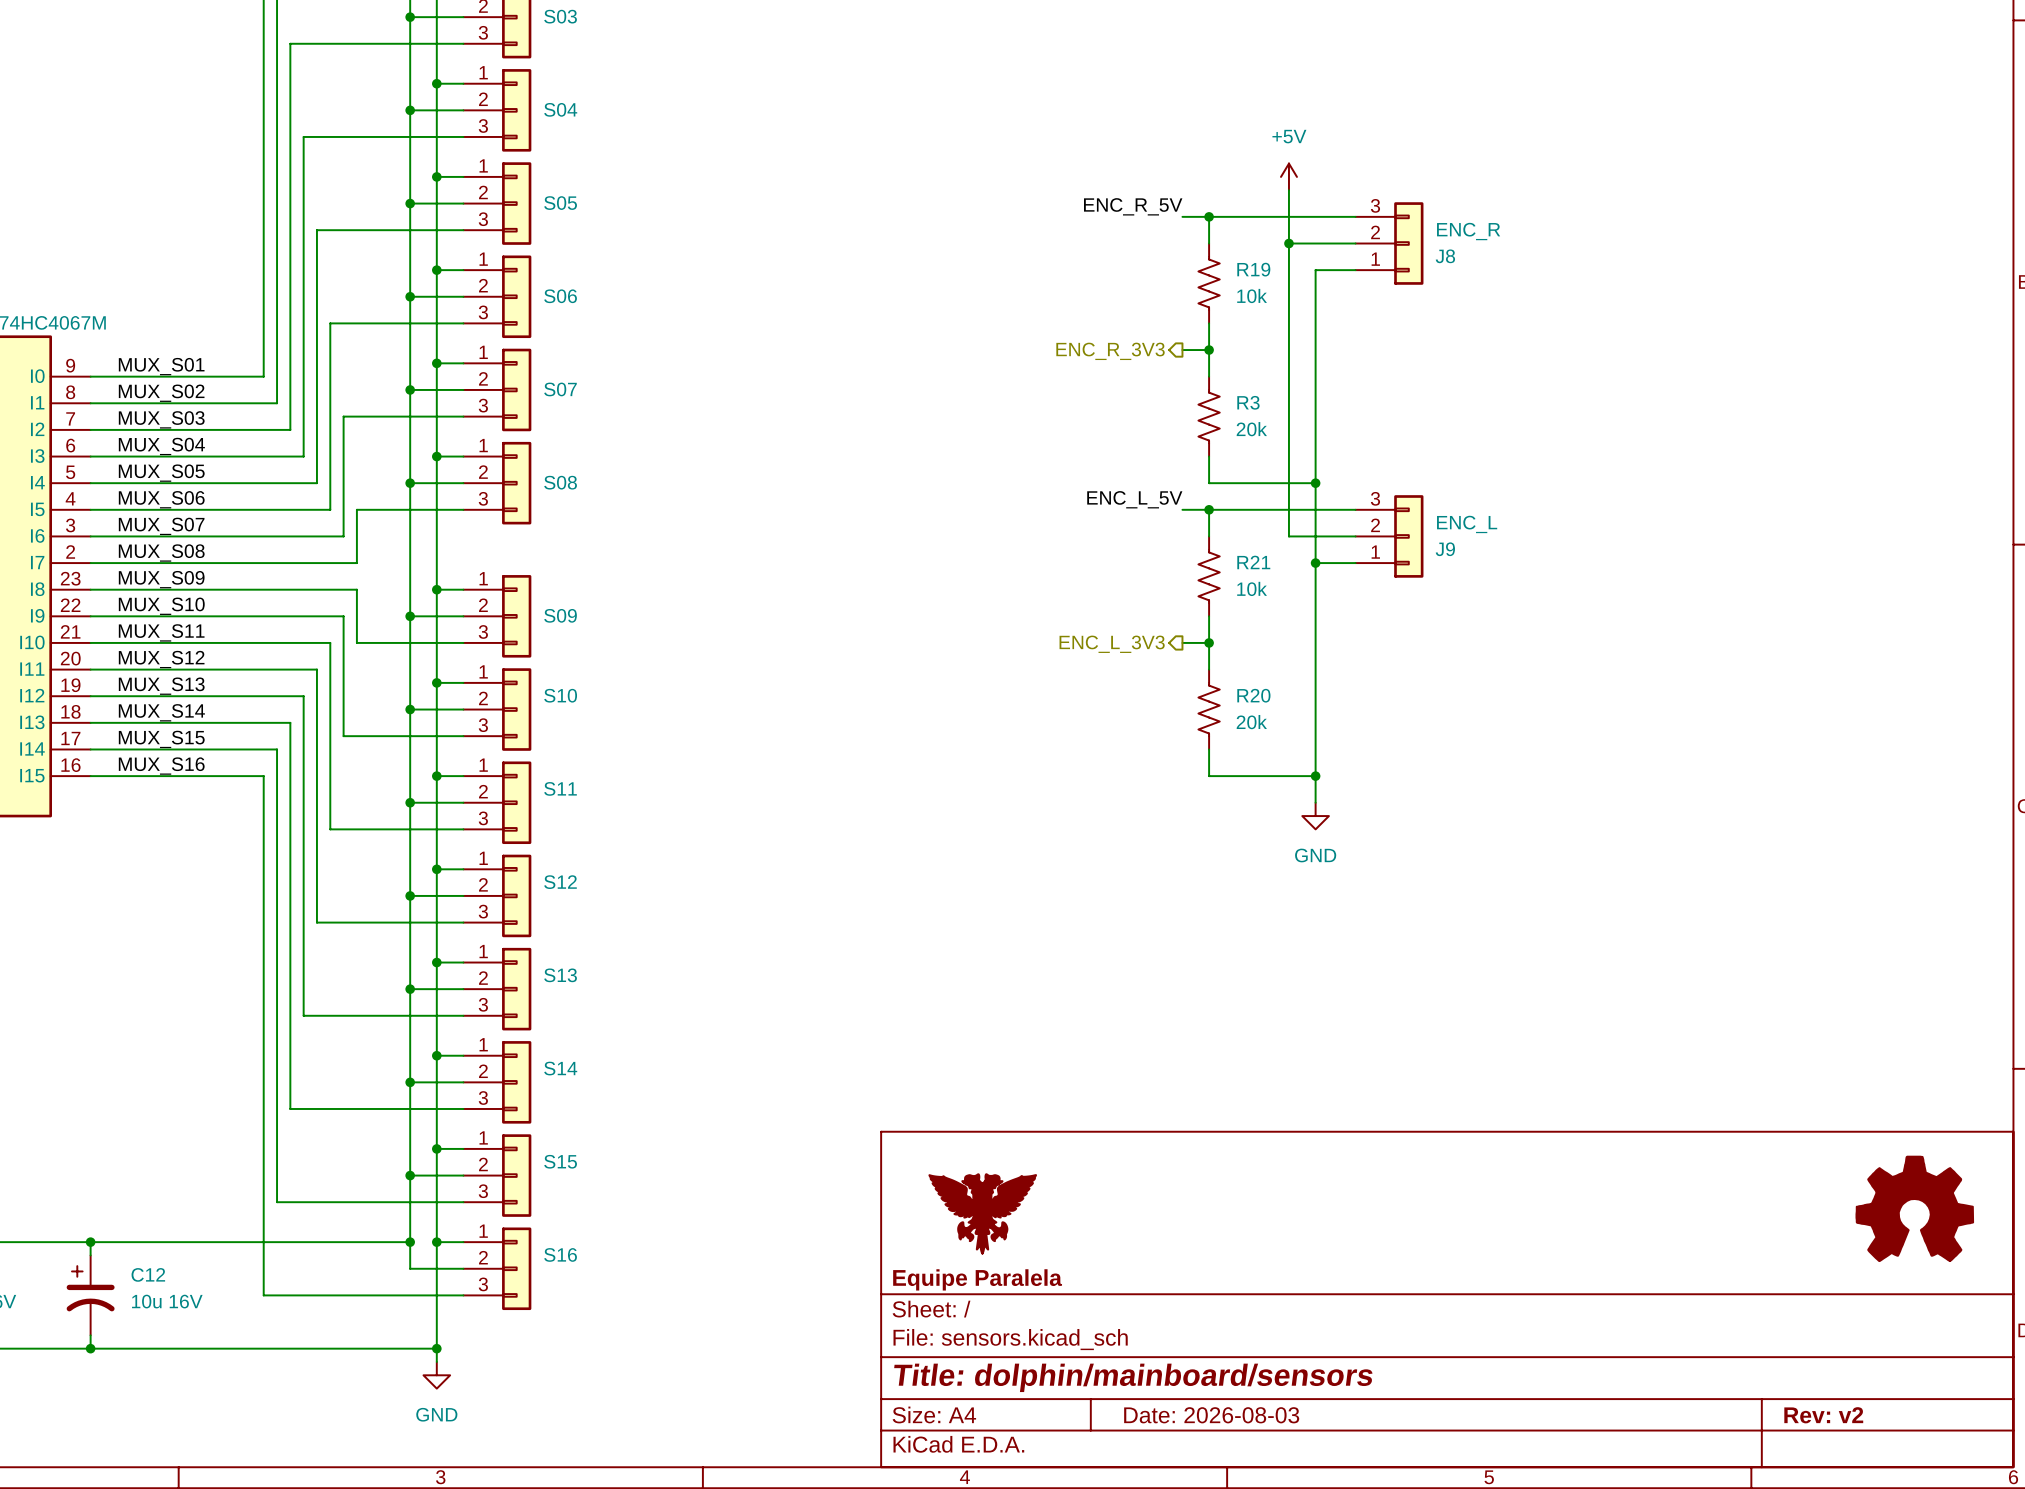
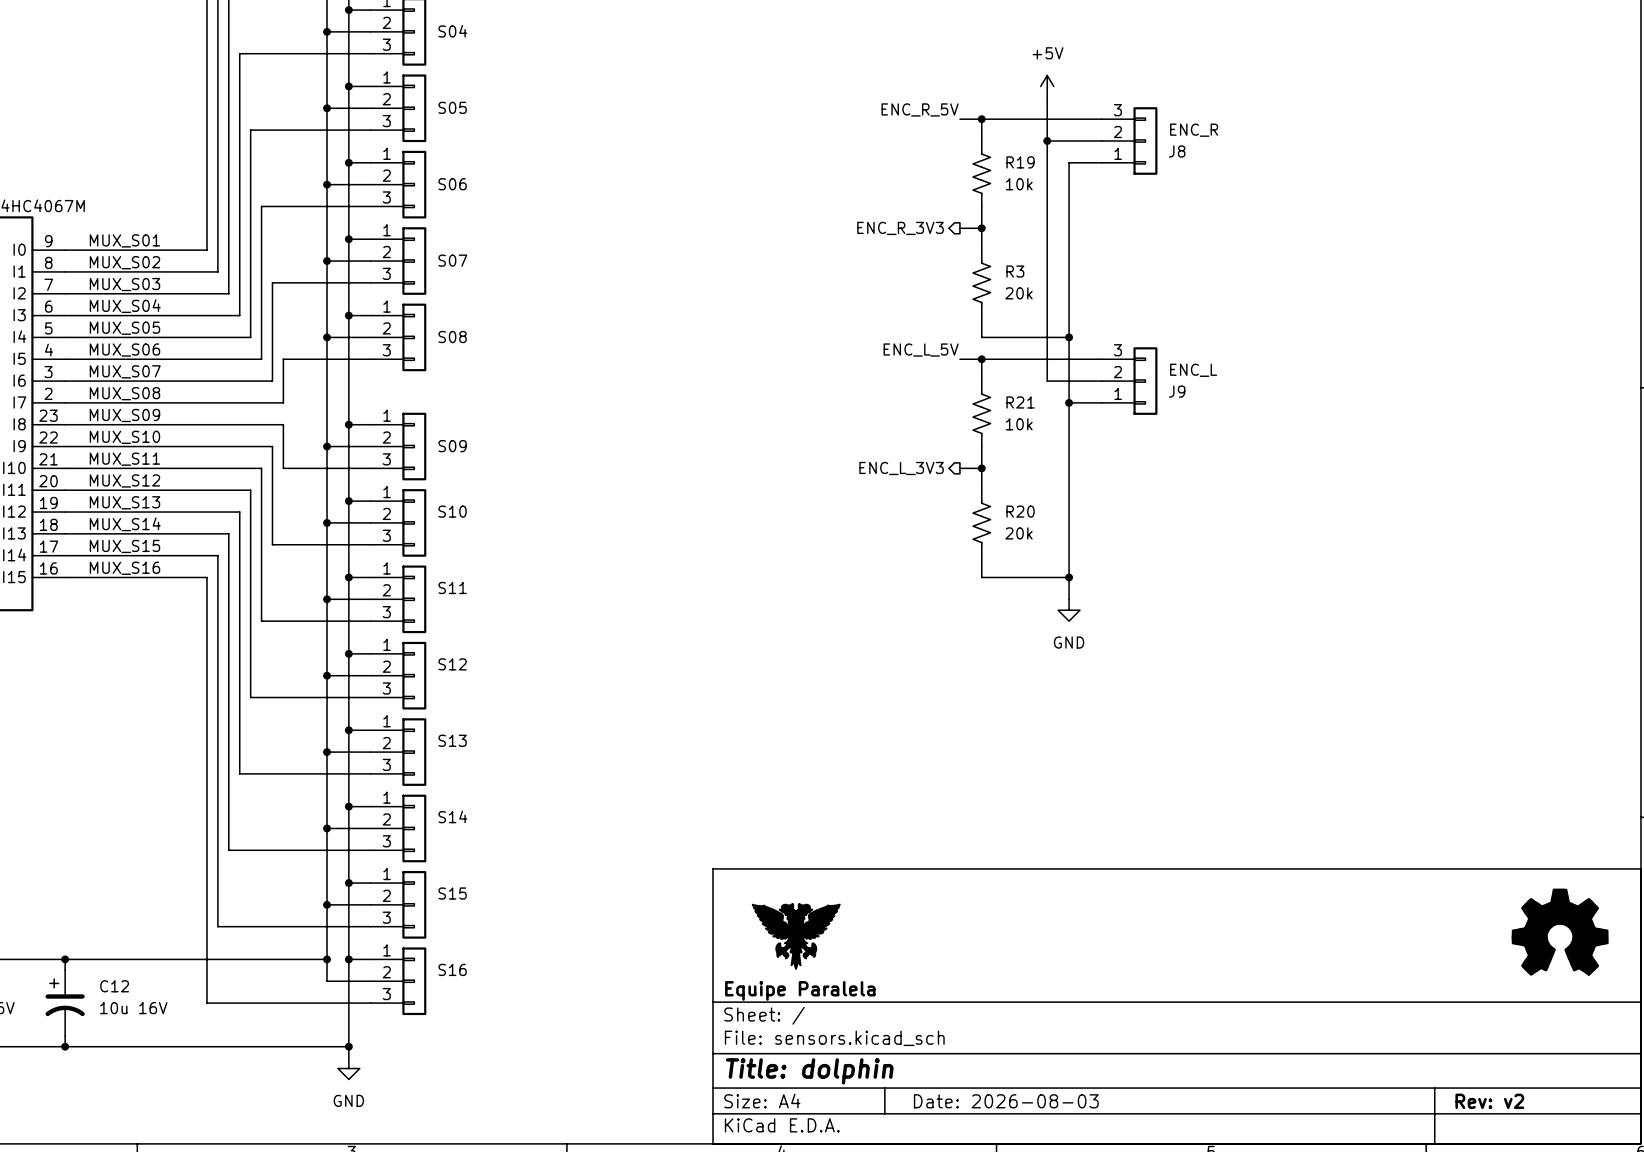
title block: Title: dolphin/mainboard/sensors (1133, 1377) -> Title: dolphin (809, 1071)

